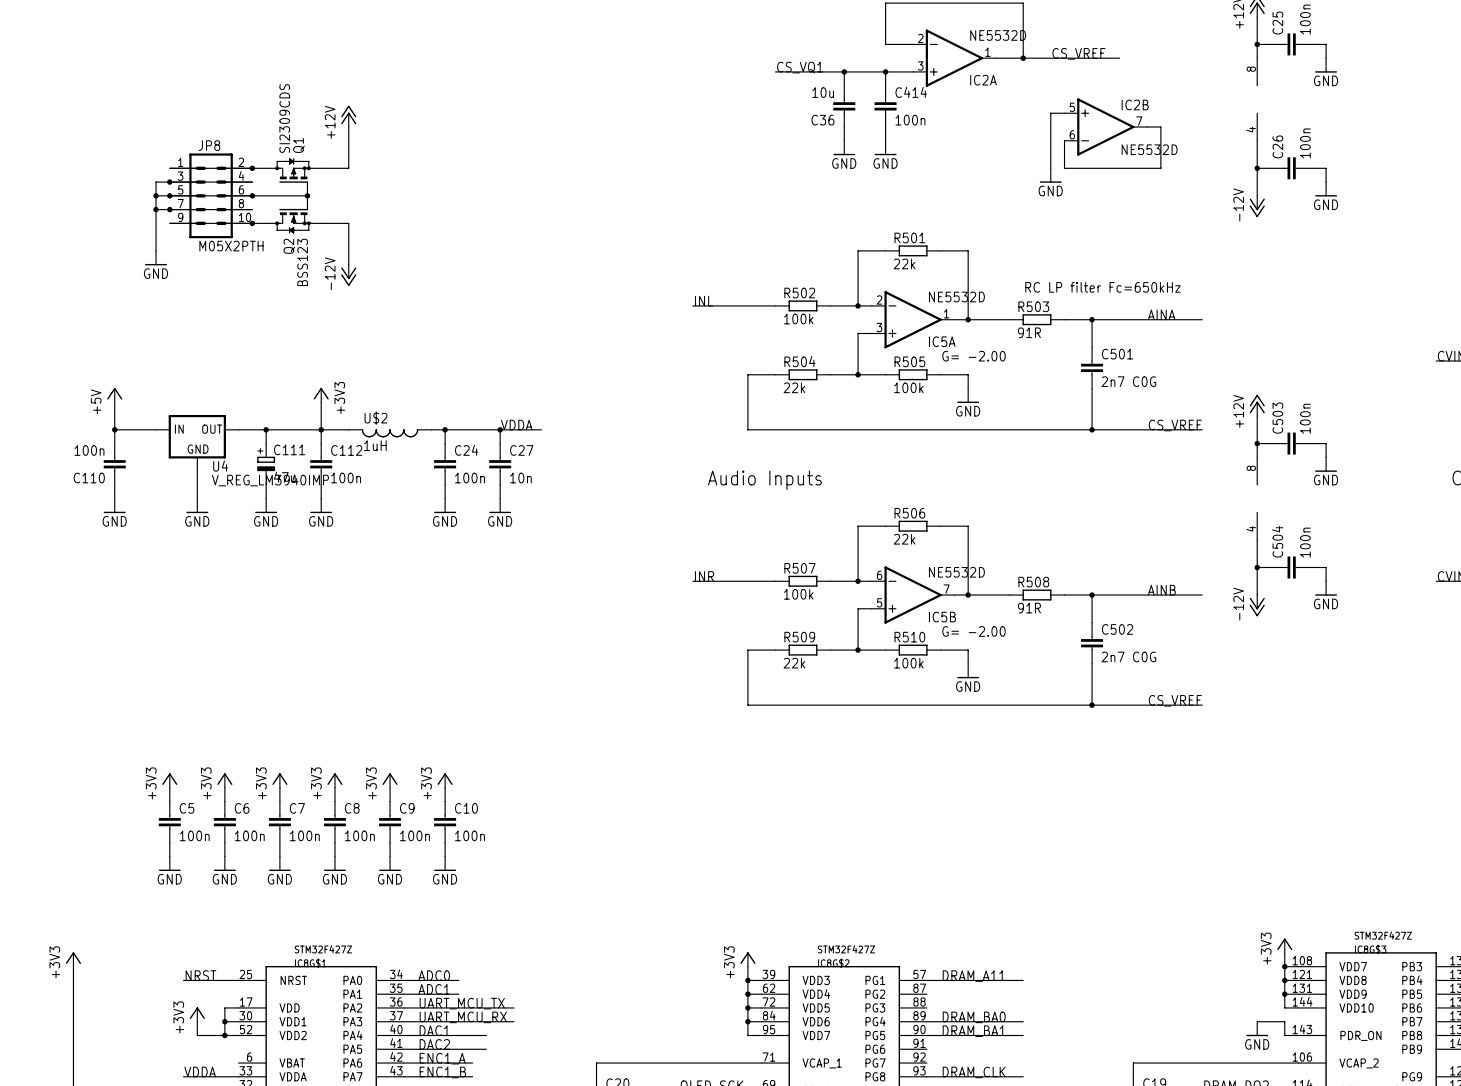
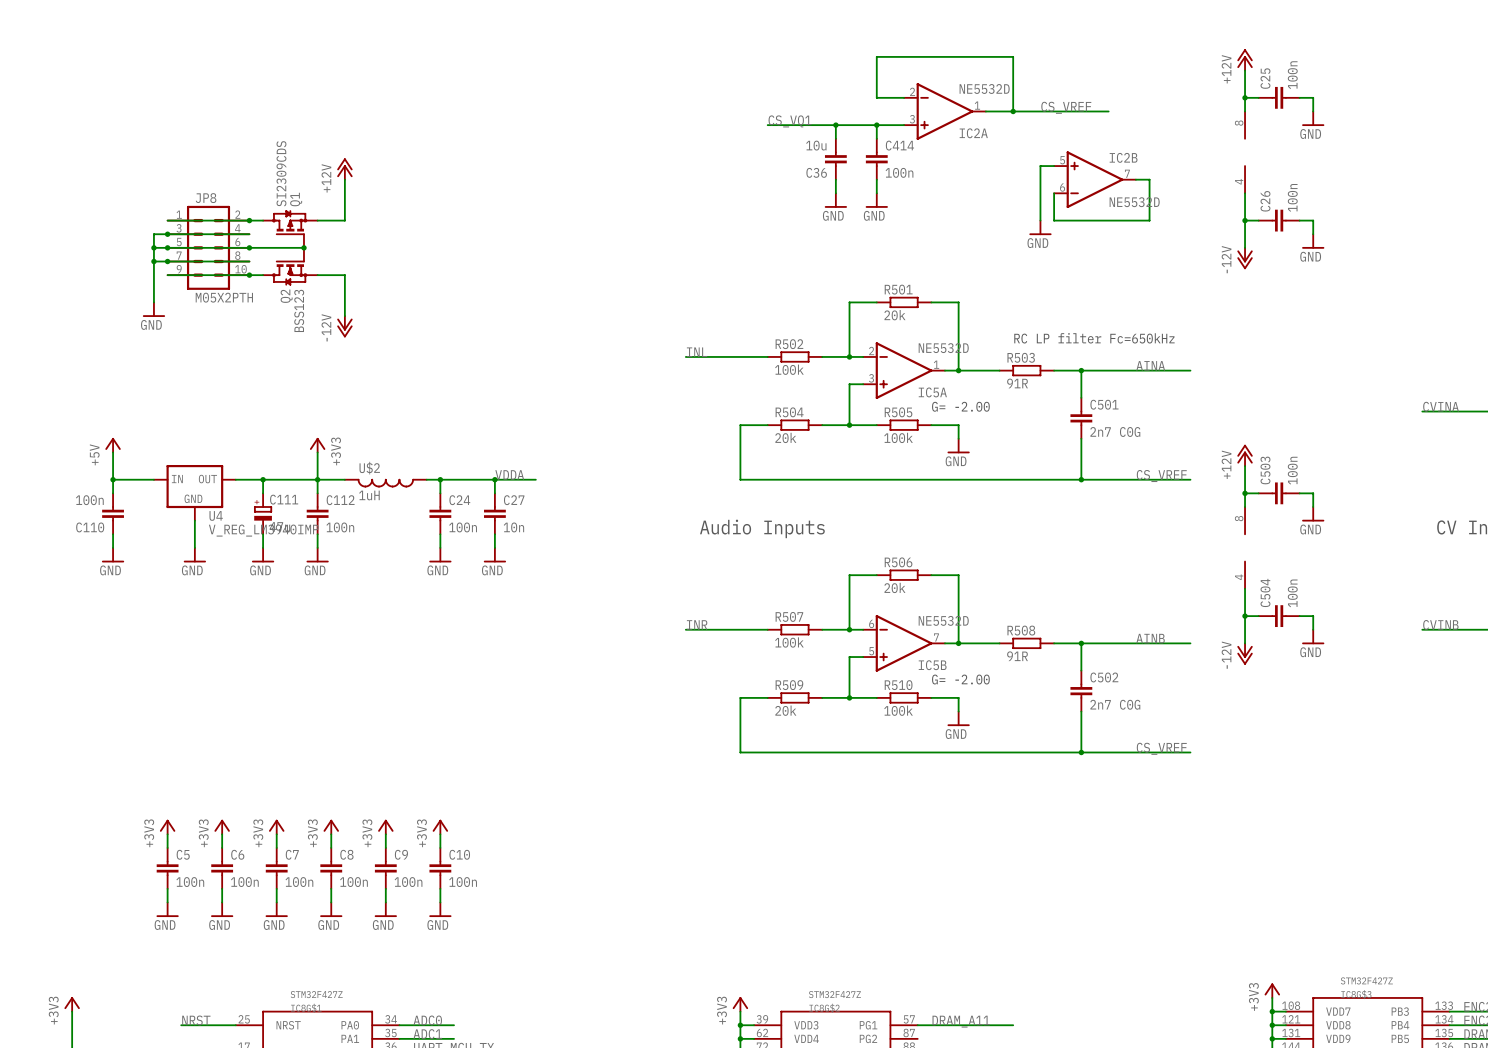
R501 value: 22k (904, 263) -> 20k (894, 315)
R504 value: 22k (794, 387) -> 20k (785, 437)
R506 value: 22k (904, 539) -> 20k (894, 587)
R509 value: 22k (794, 663) -> 20k (785, 710)

